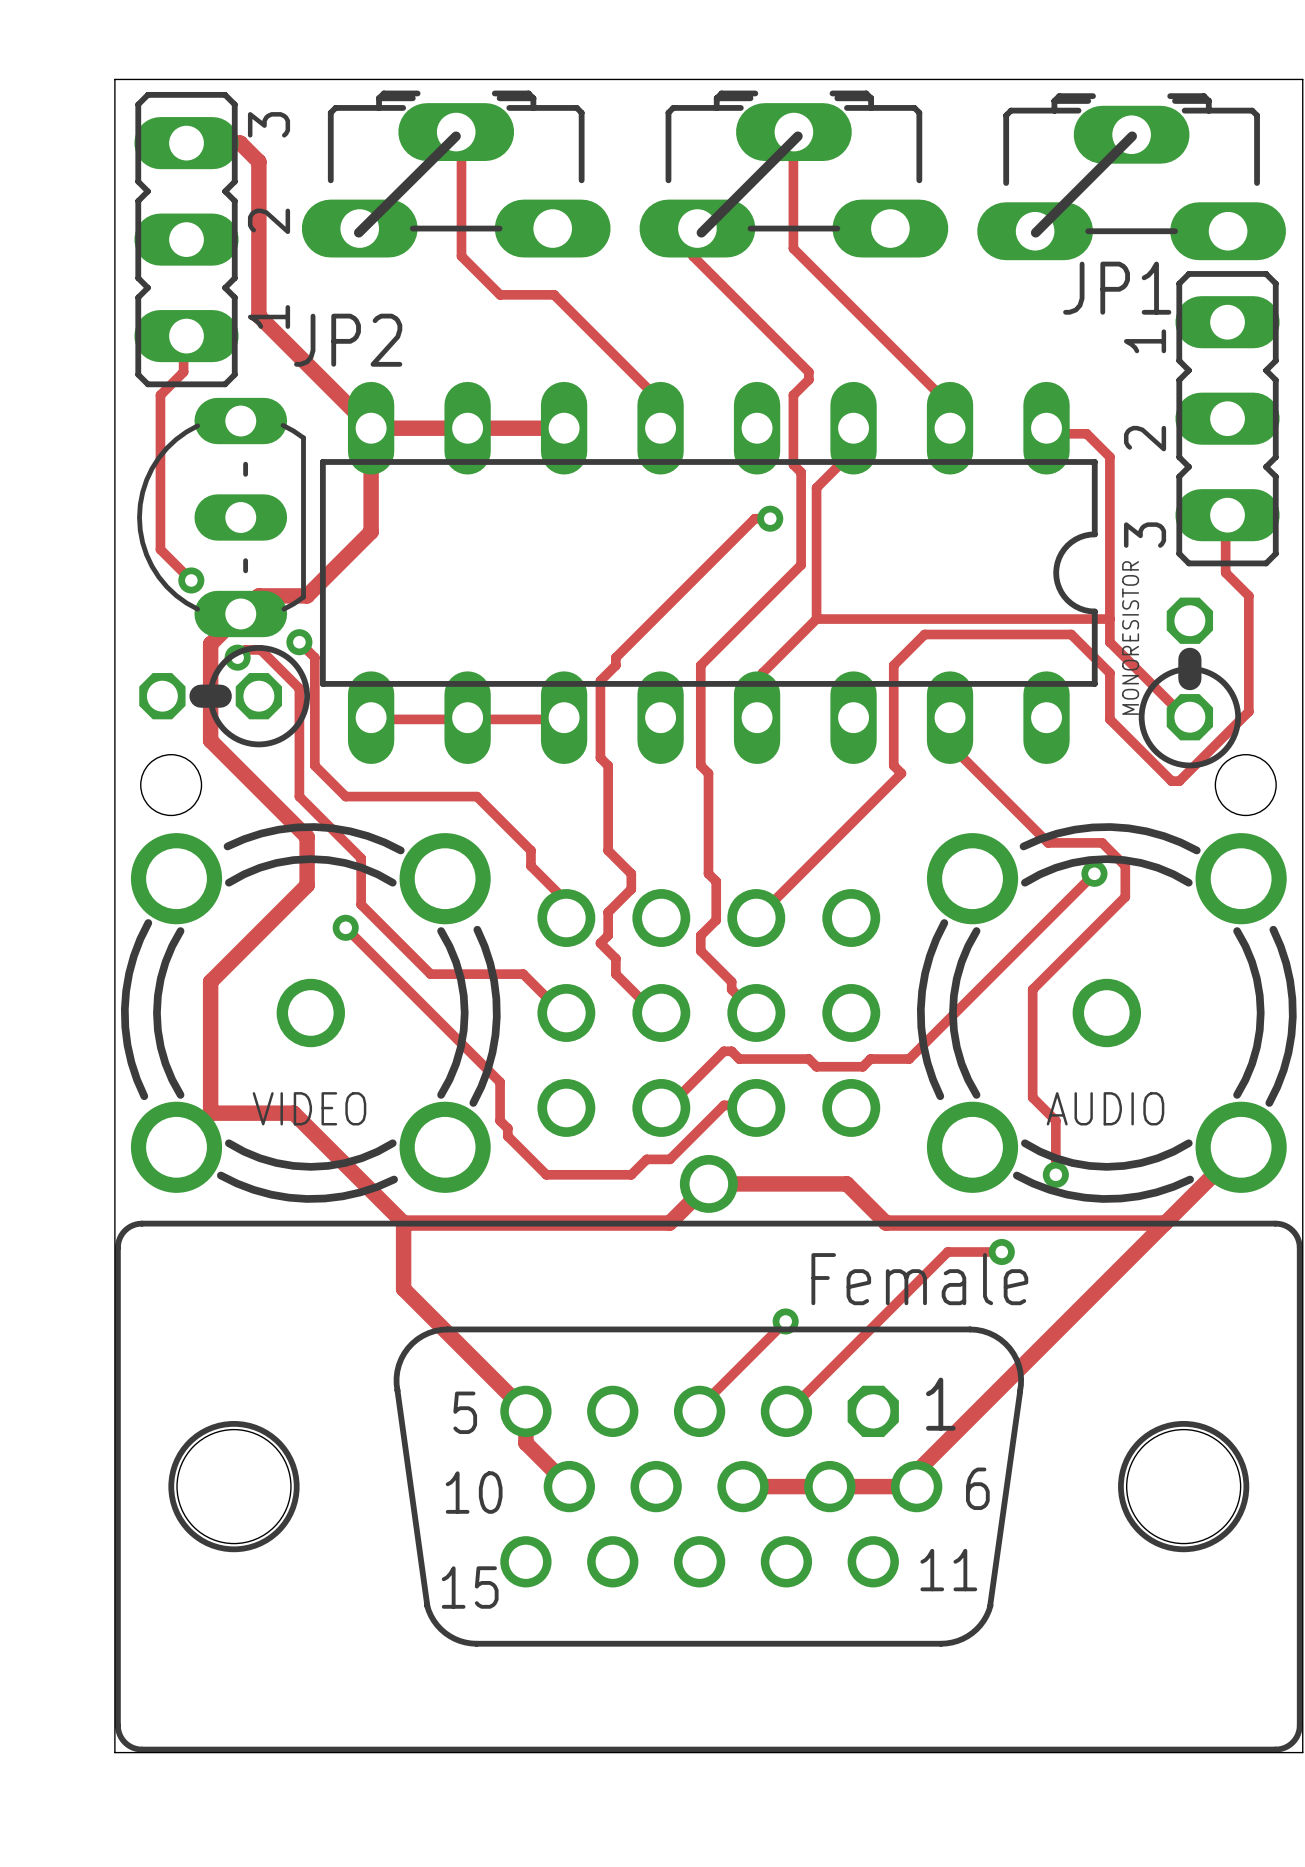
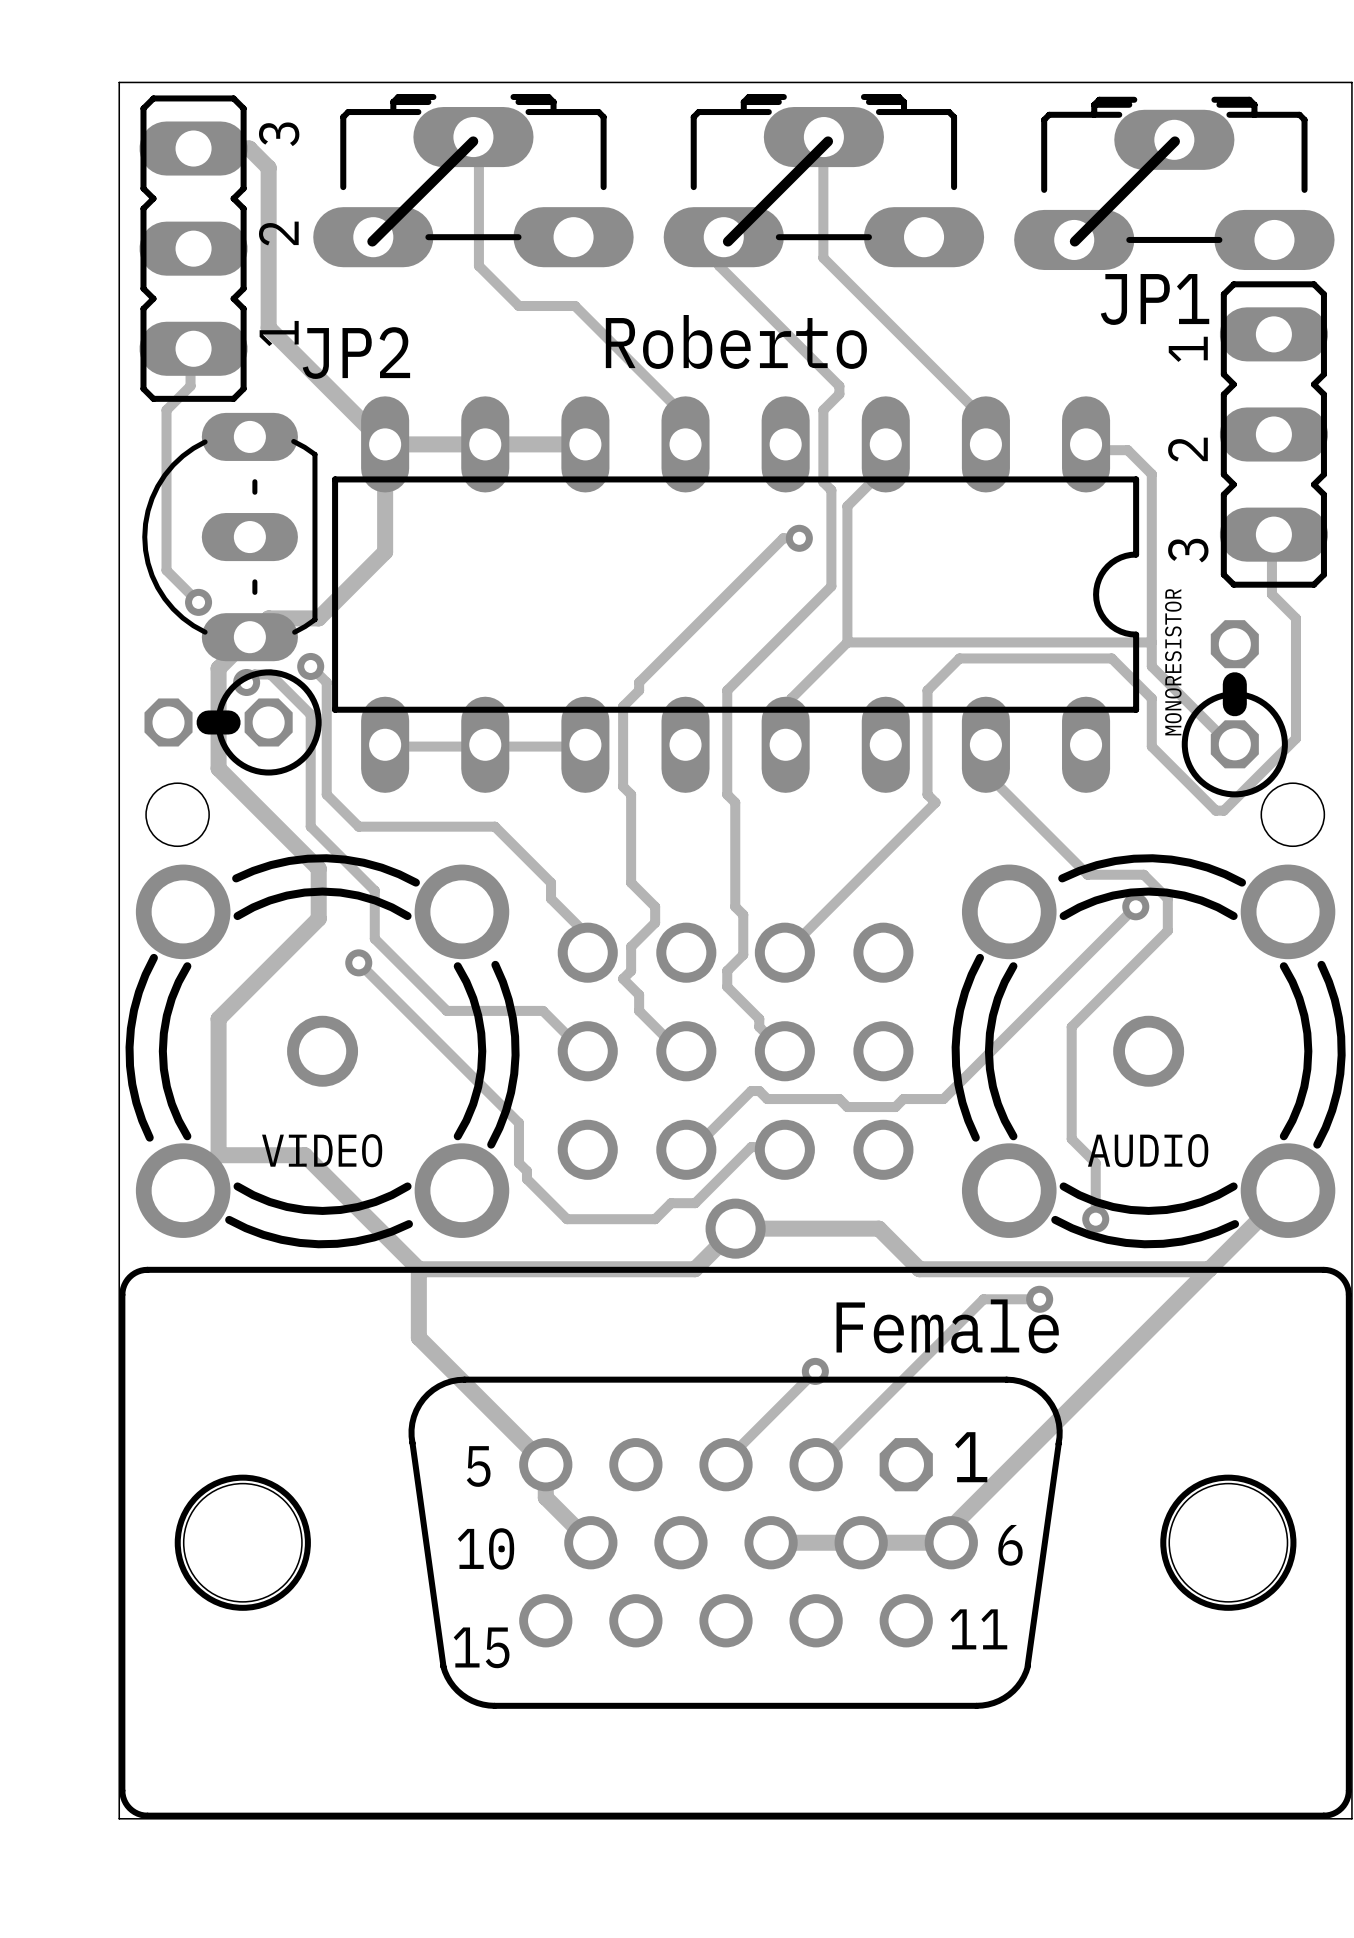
text: none -> Roberto (736, 341)

